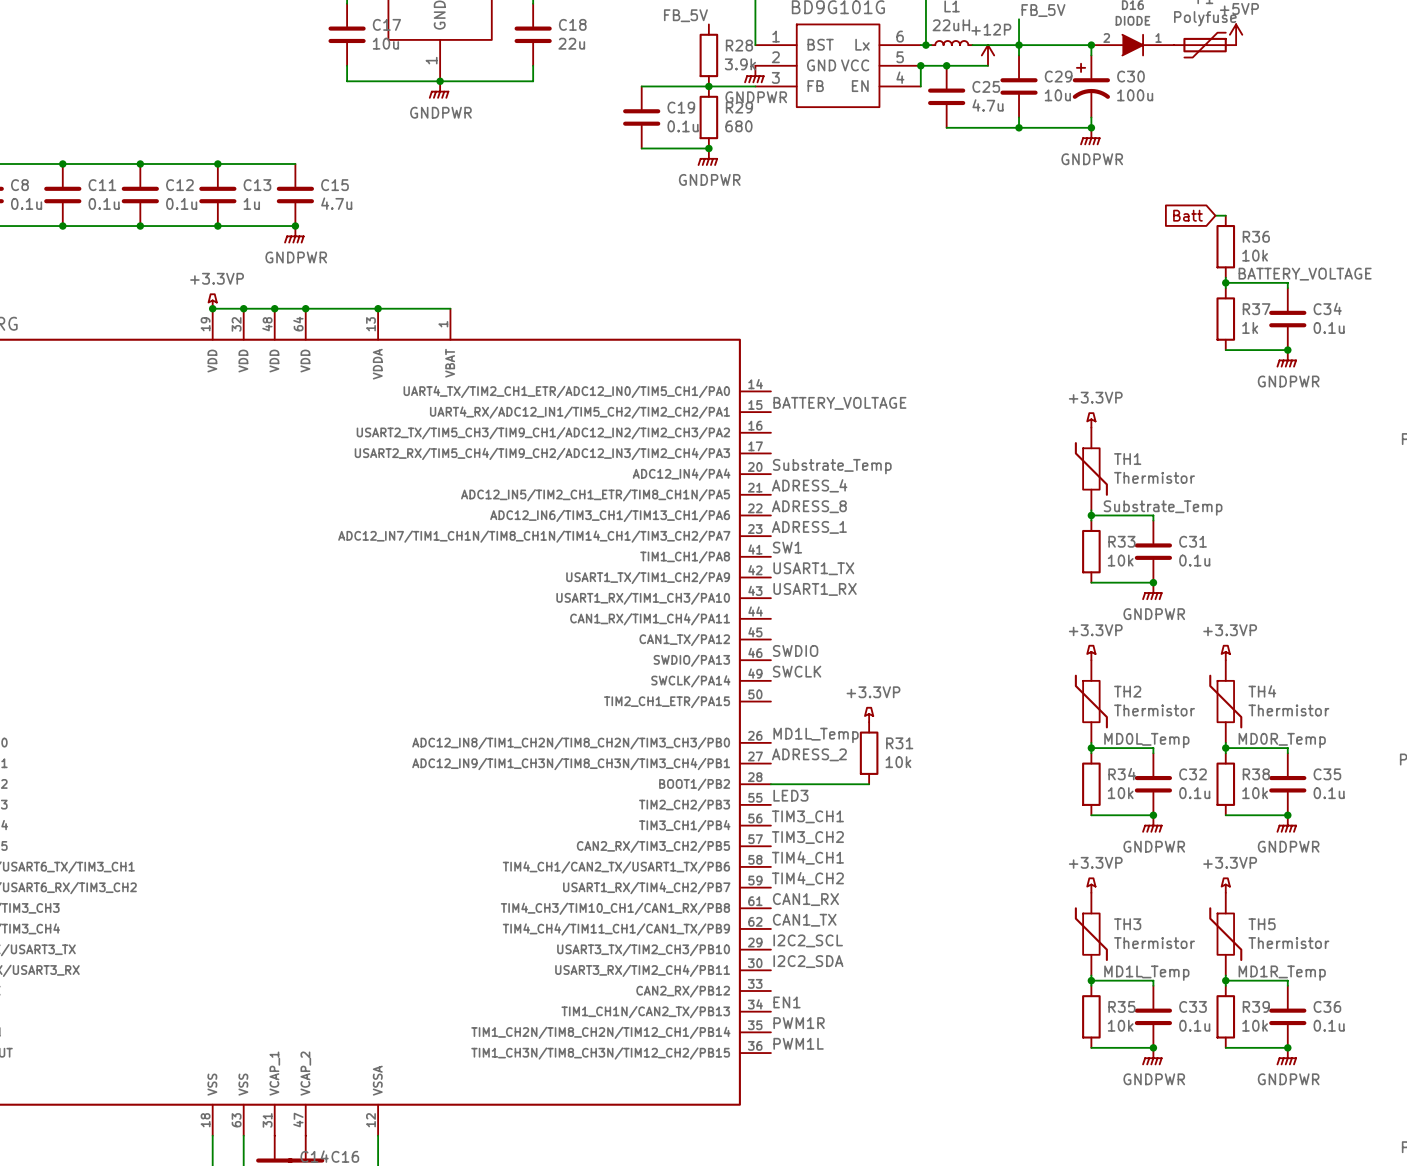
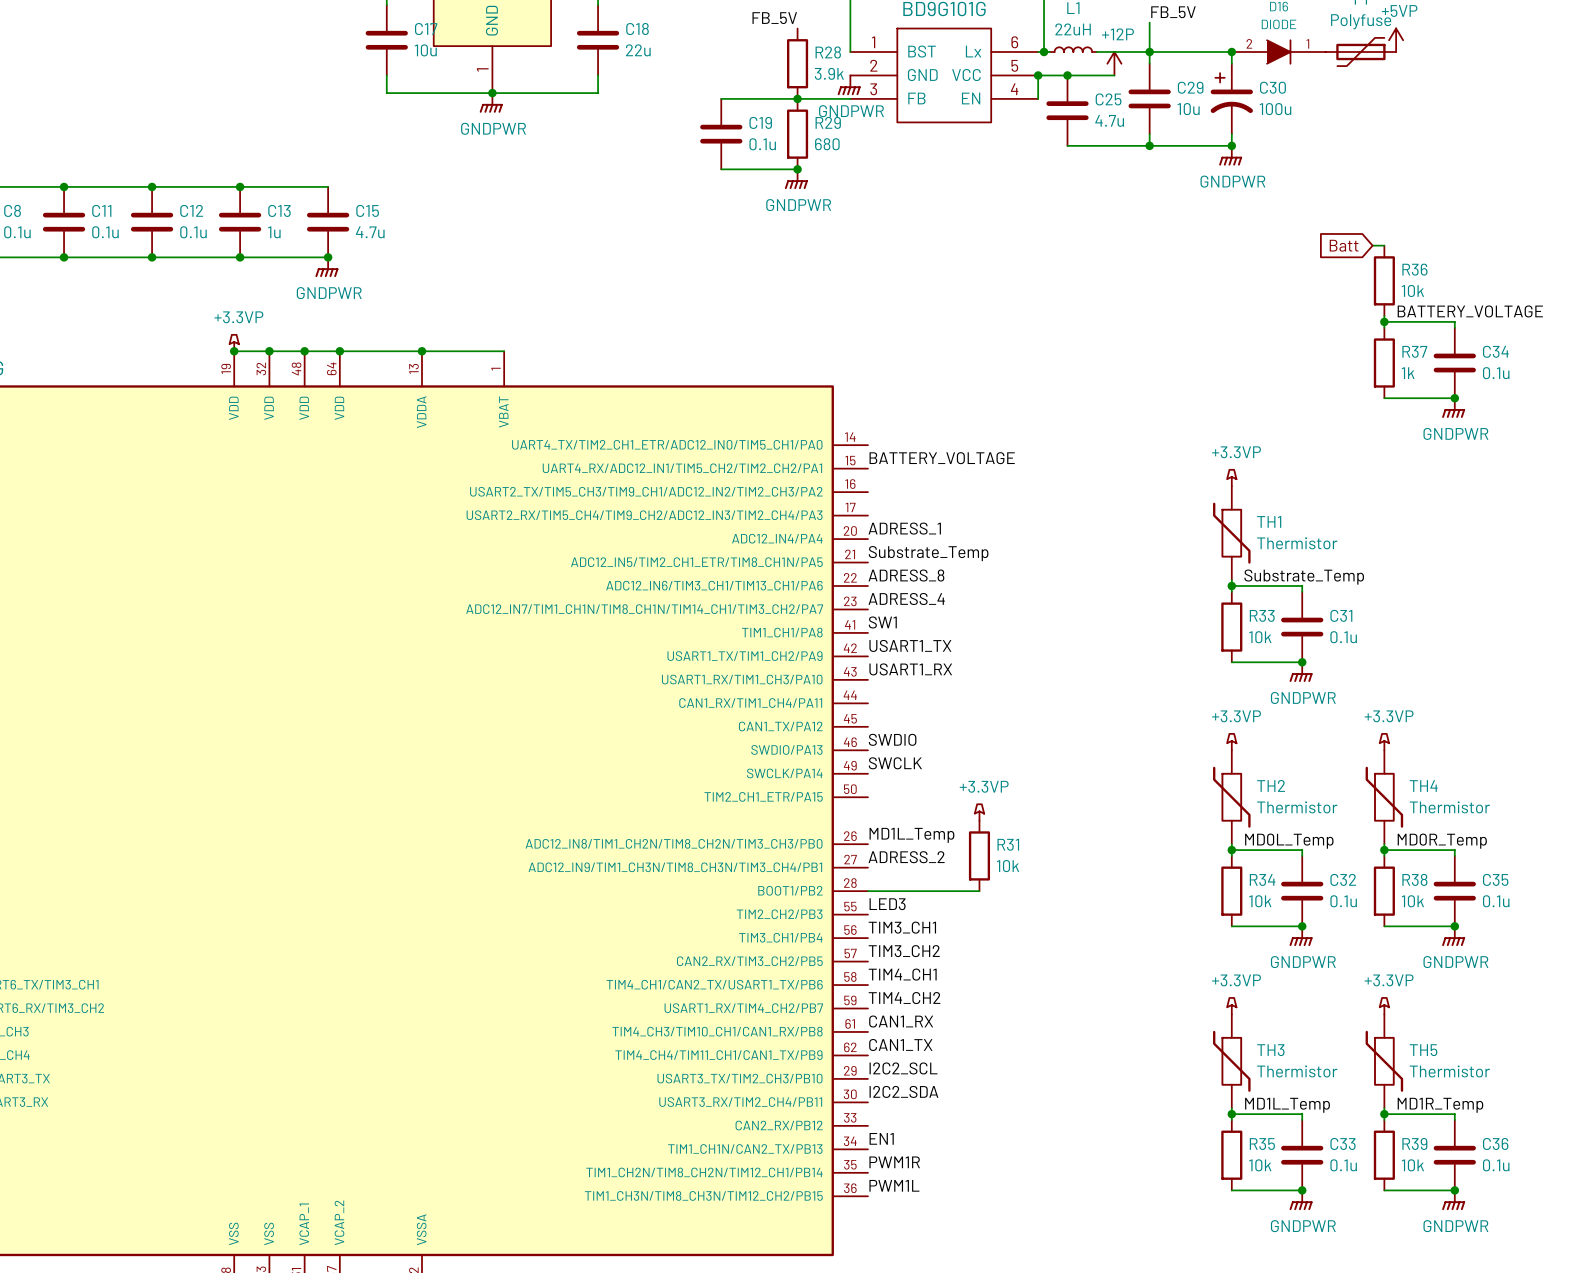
label: Substrate_Temp (832, 466) -> ADRESS_1 (904, 528)
label: ADRESS_4 (809, 485) -> Substrate_Temp (928, 553)
label: ADRESS_1 (809, 527) -> ADRESS_4 (906, 599)

